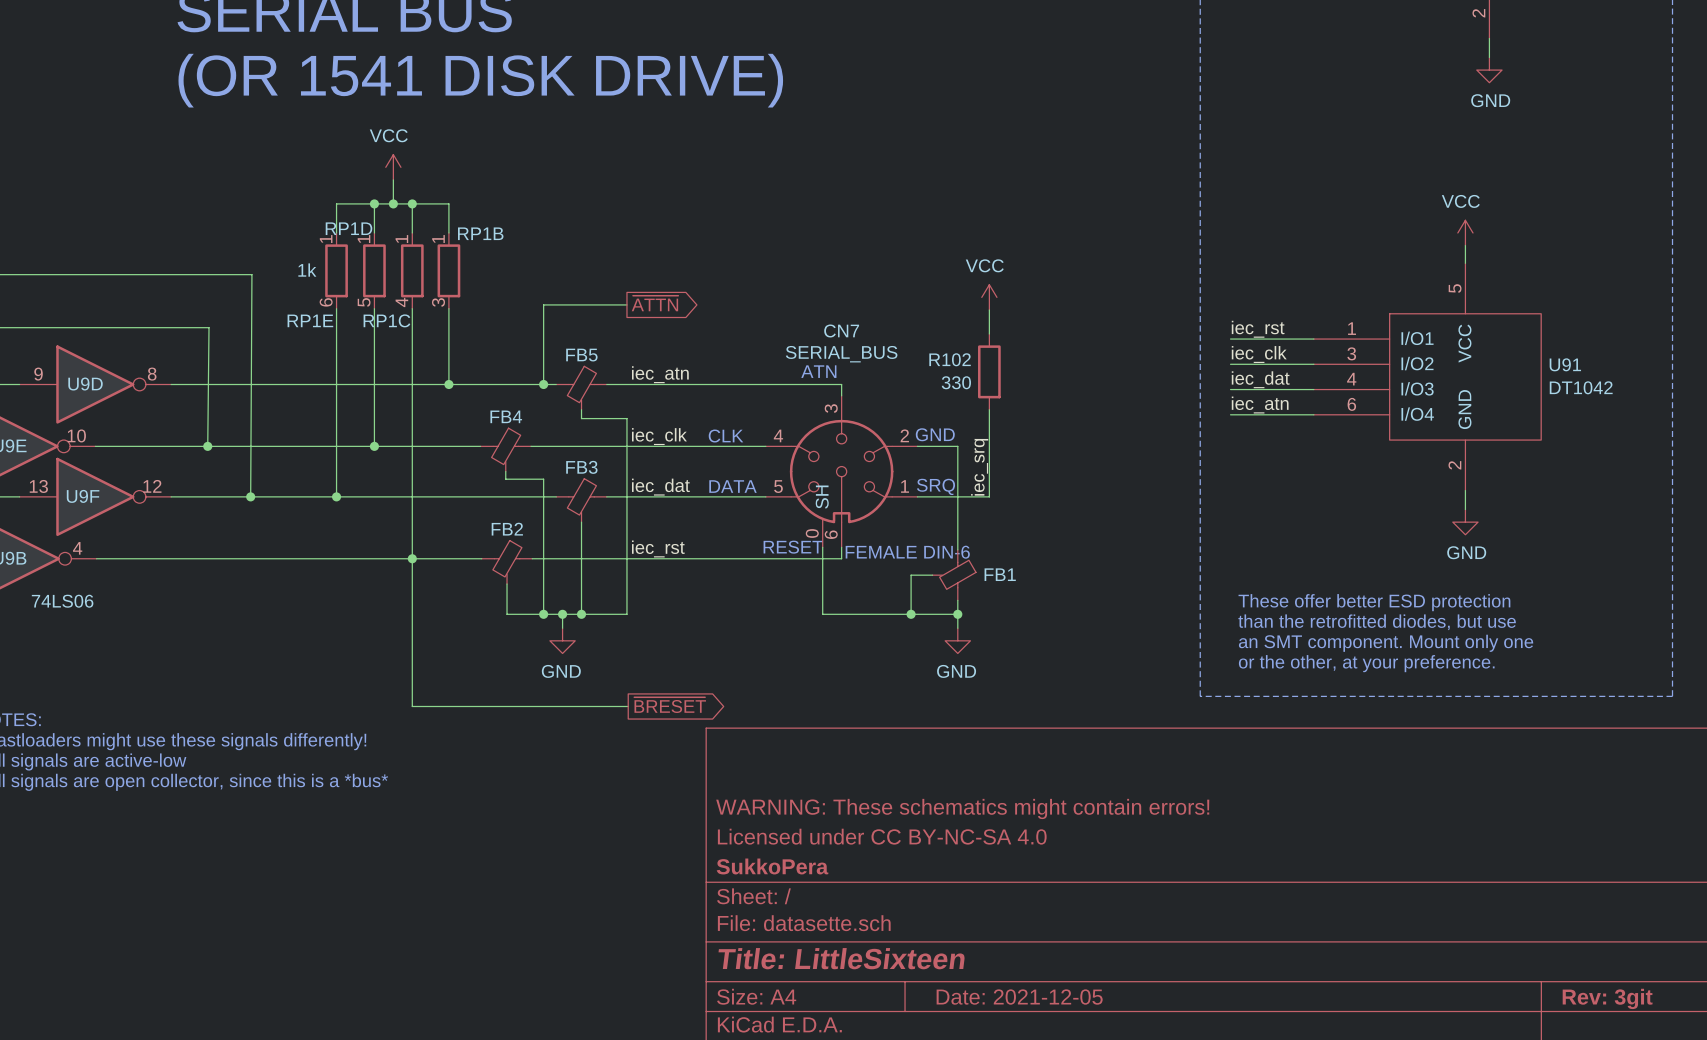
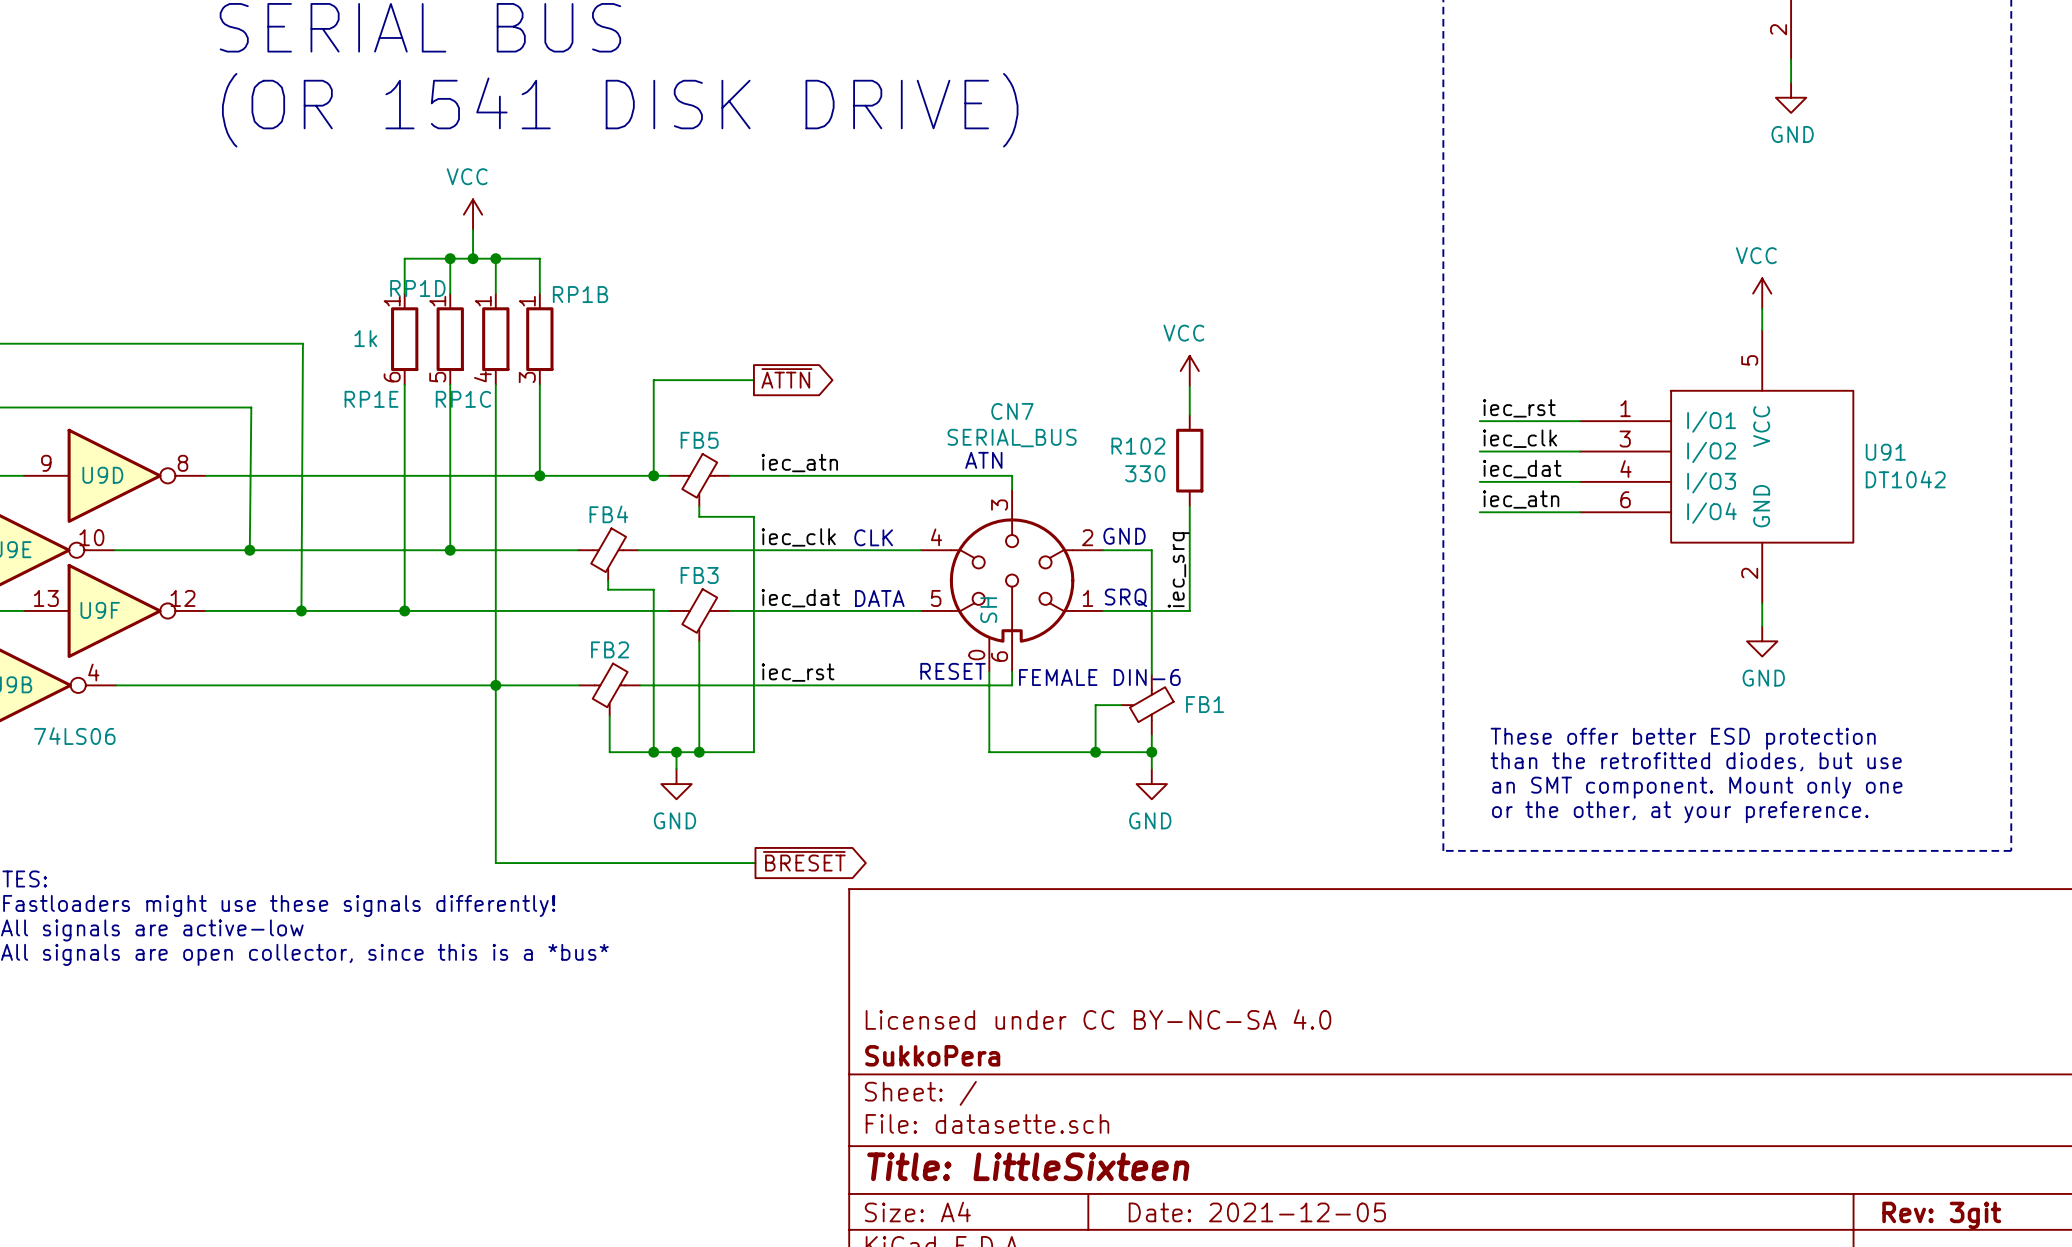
title block: WARNING: These schematics might contain errors! (962, 808) -> none

